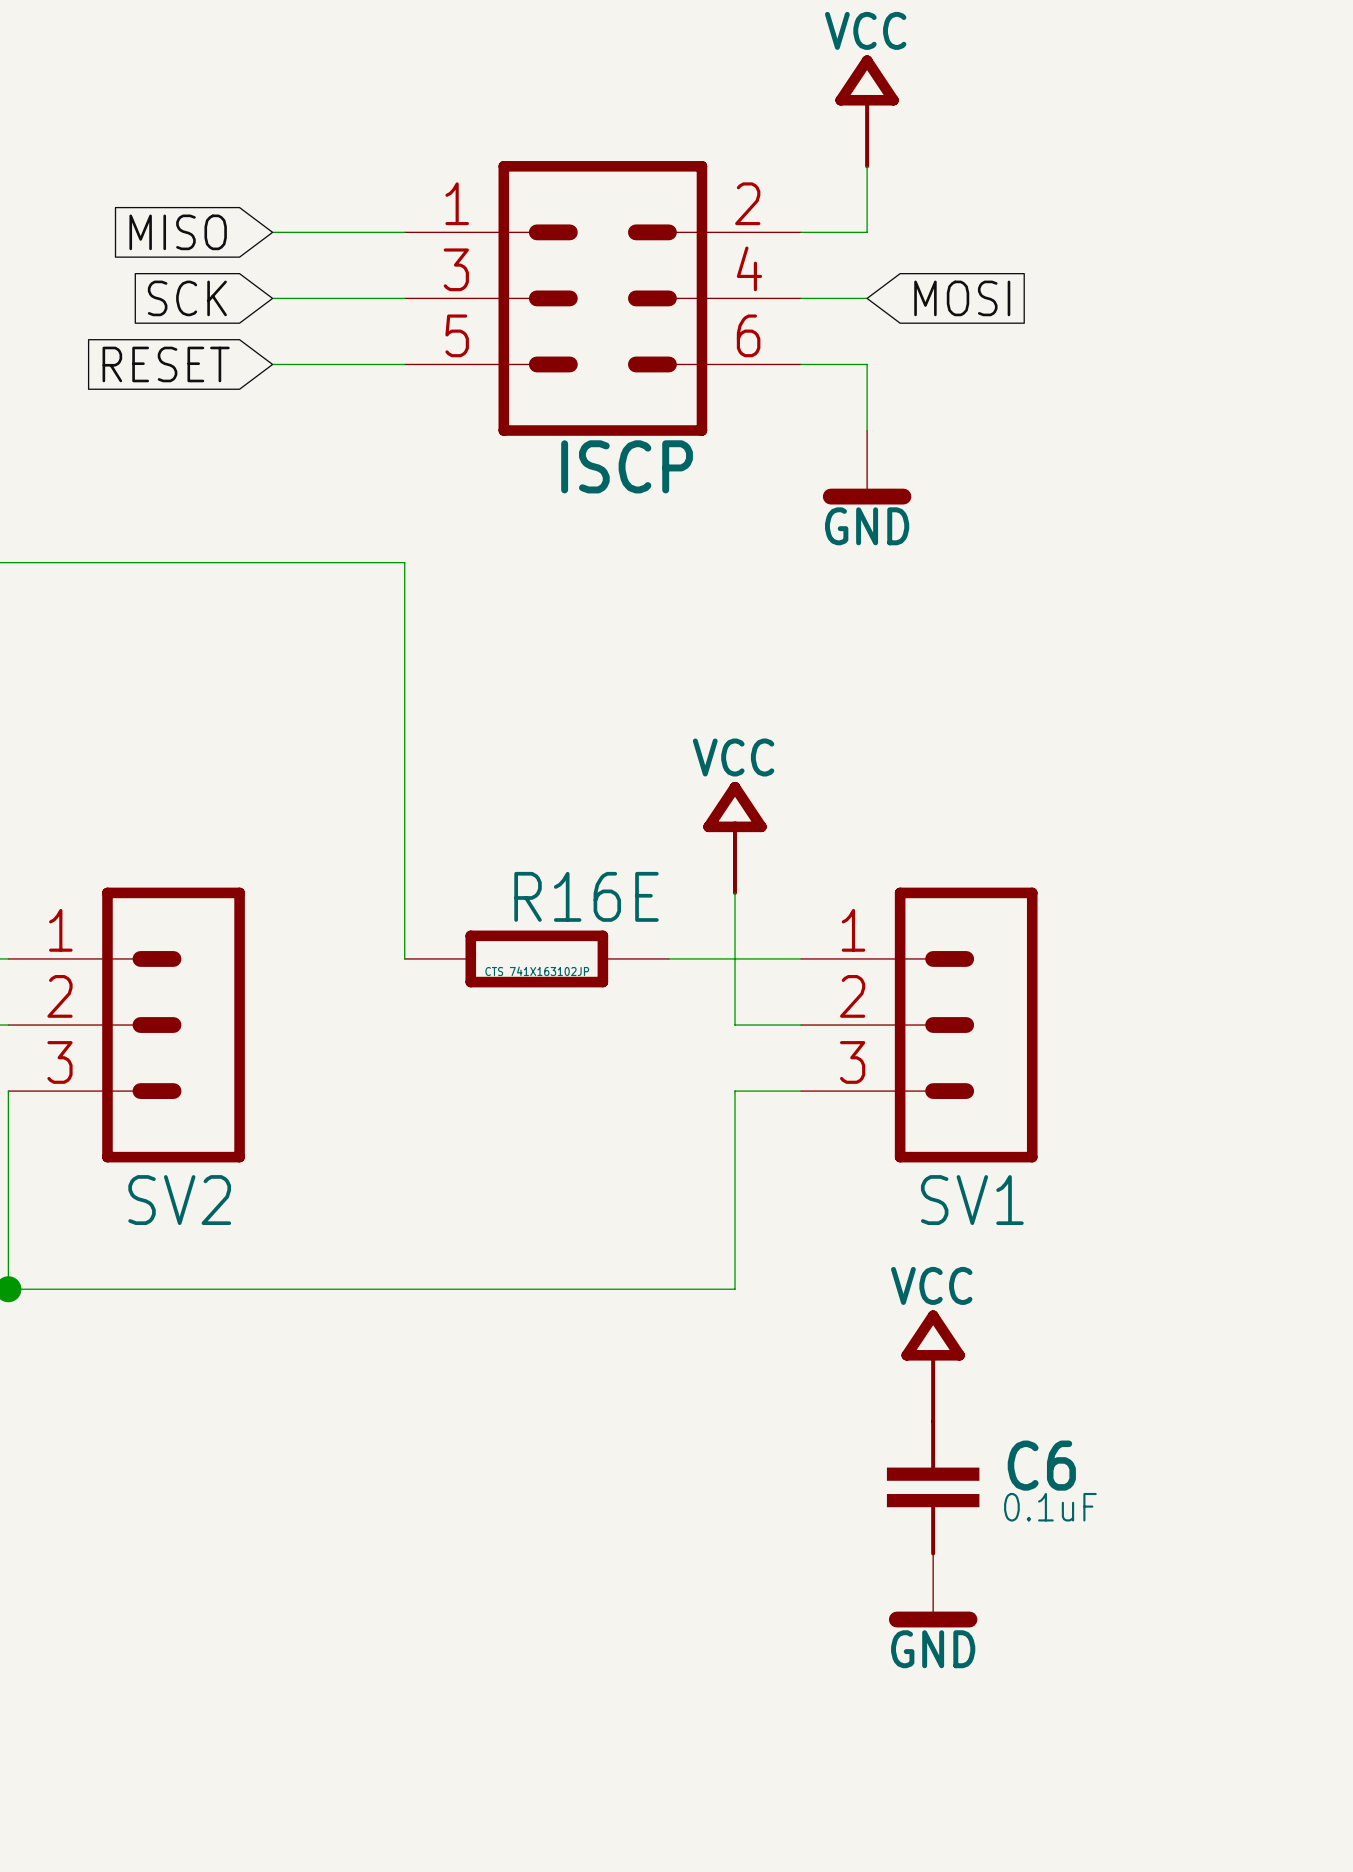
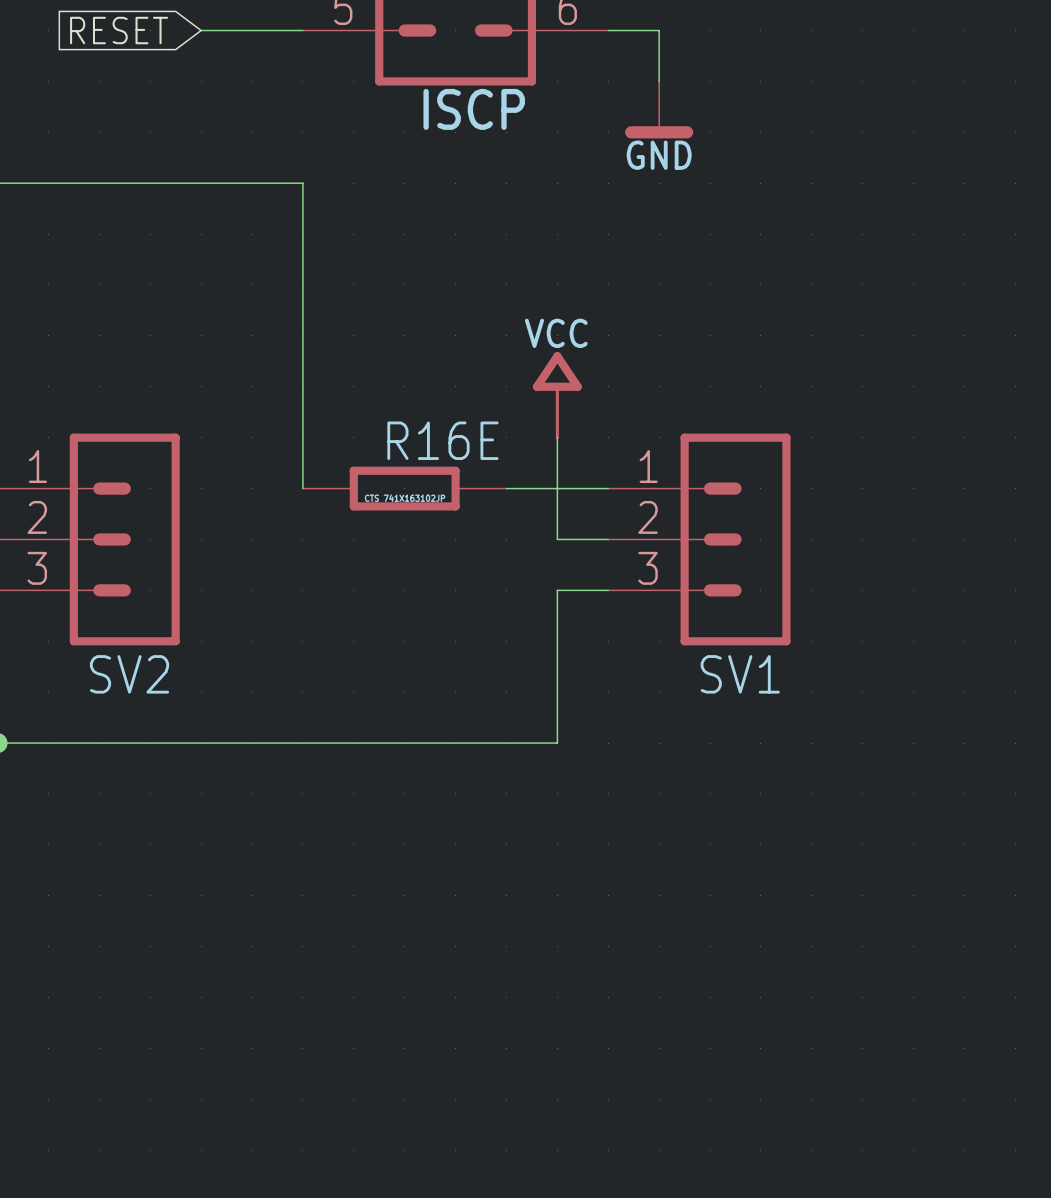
power symbol: VCC (933, 1366) -> none
C6: 0.1uF (933, 1487) -> none
power symbol: GND (933, 1590) -> none

